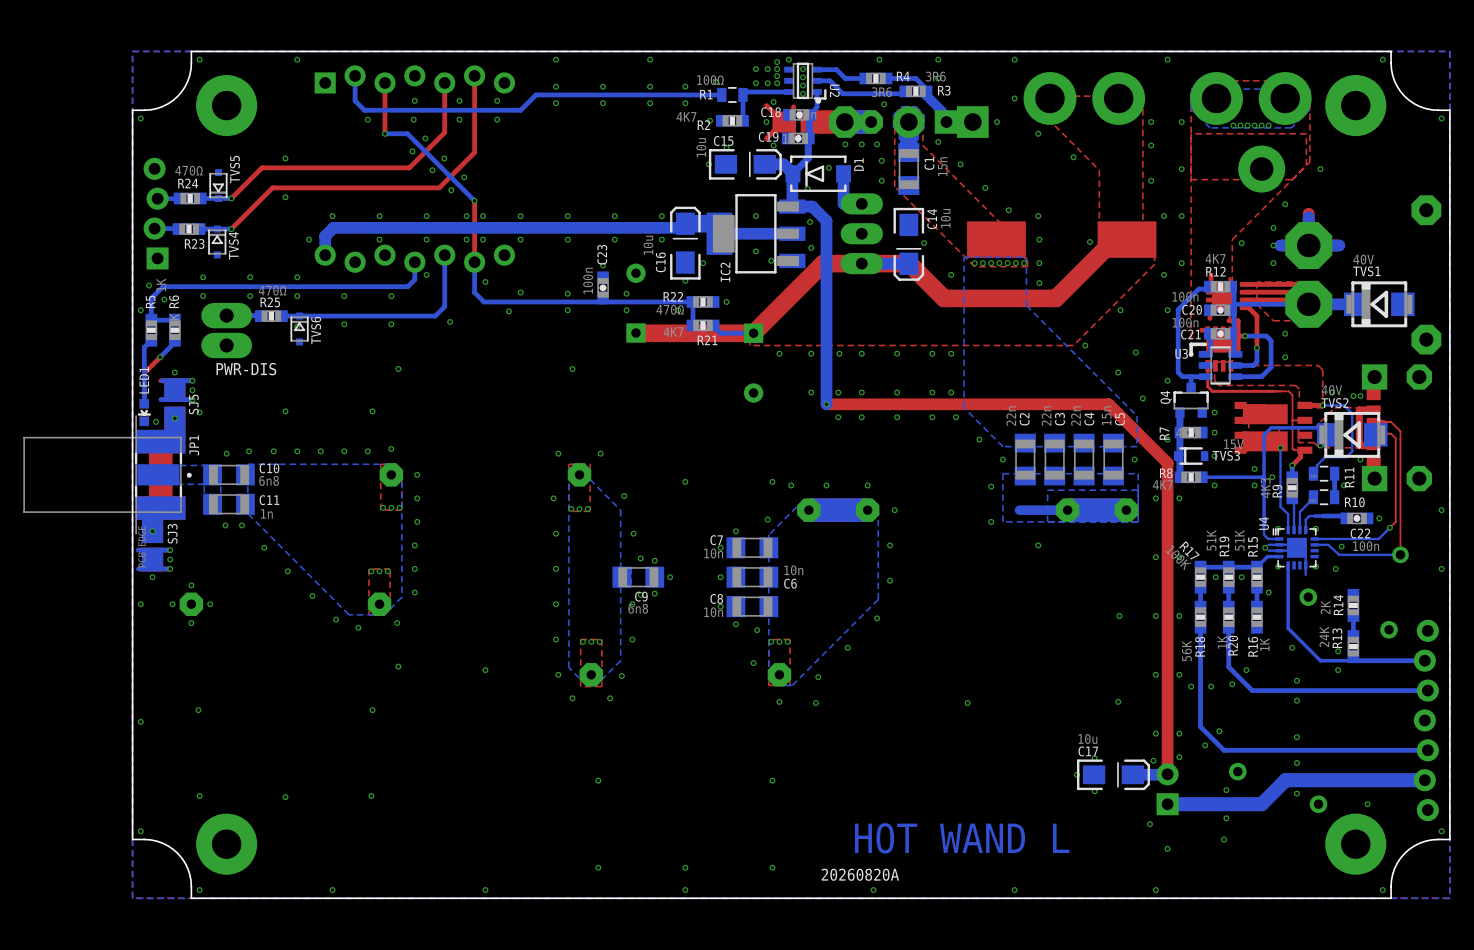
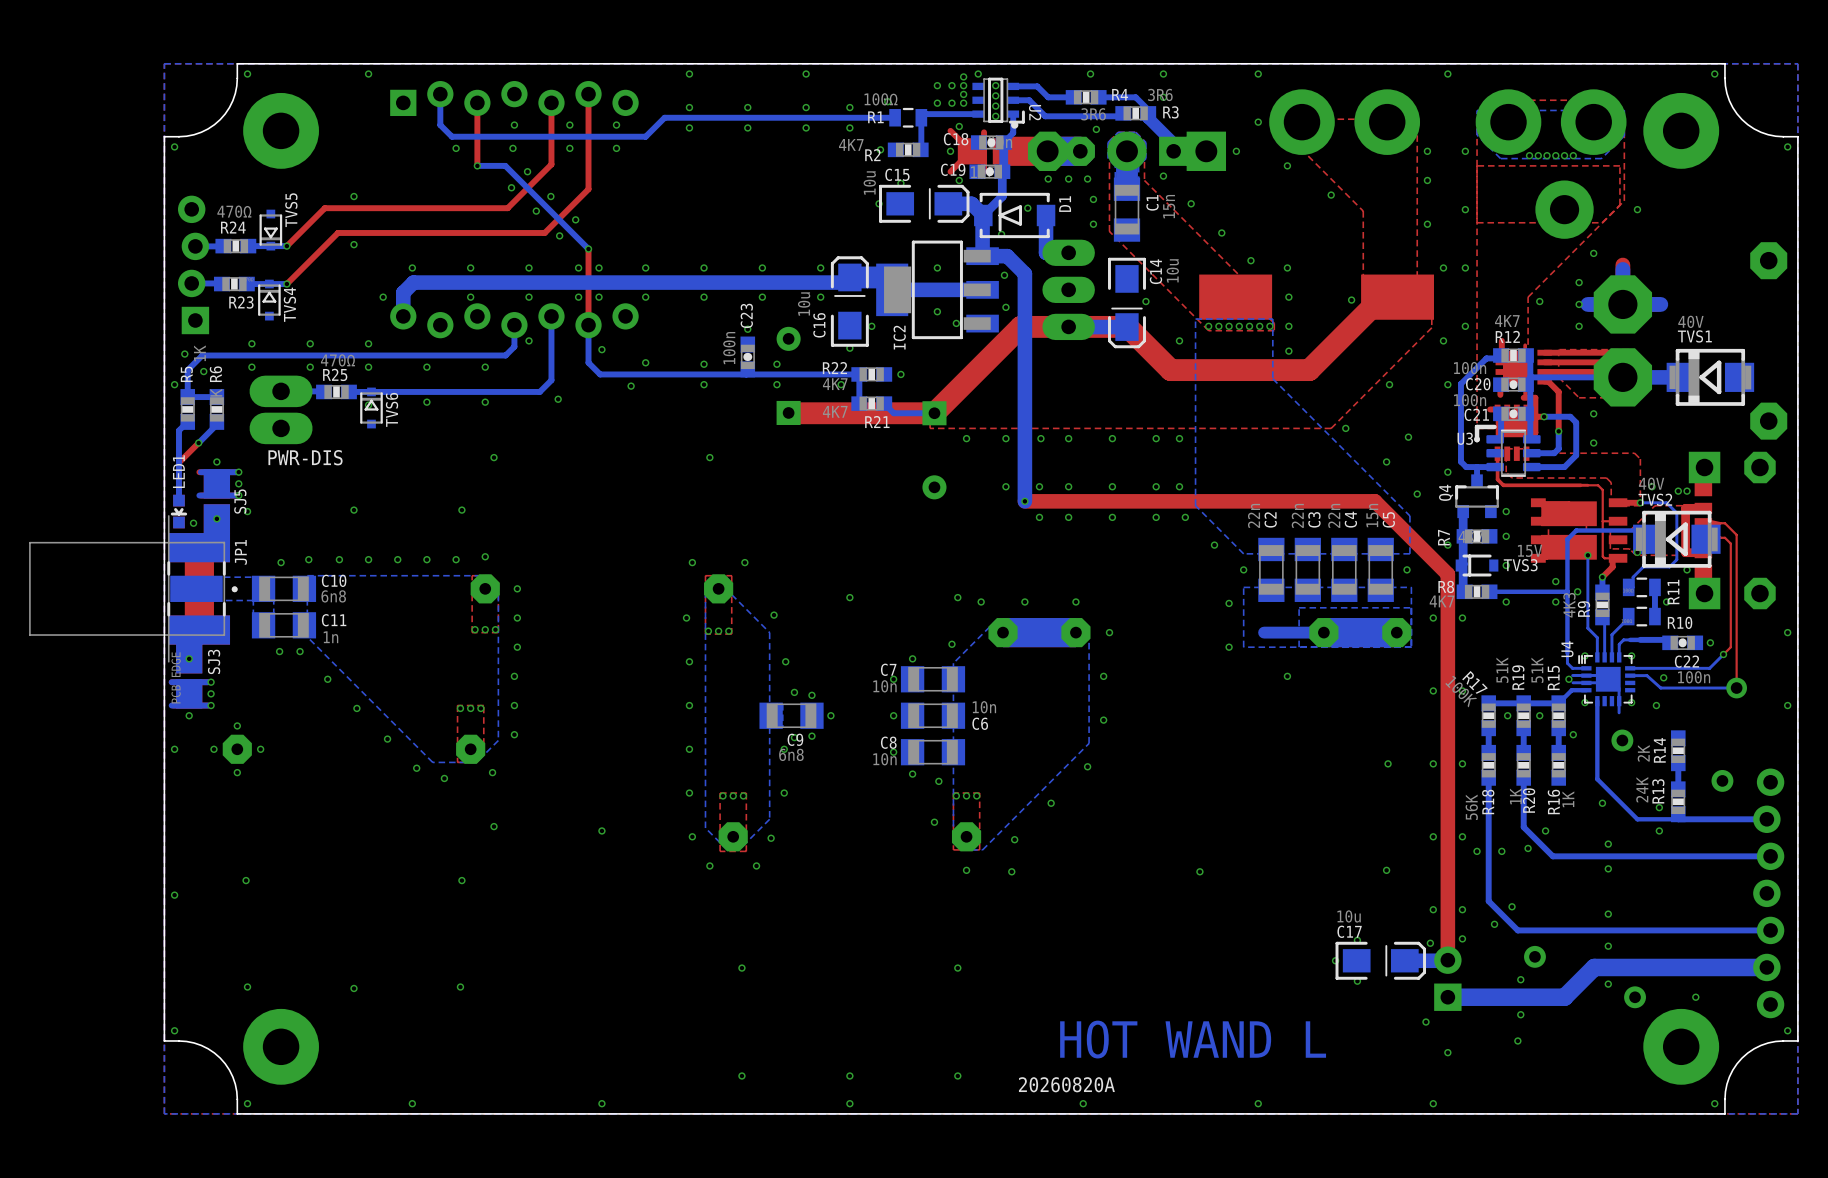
R22 value: 470Ω (670, 309) -> 4K7 (835, 384)

